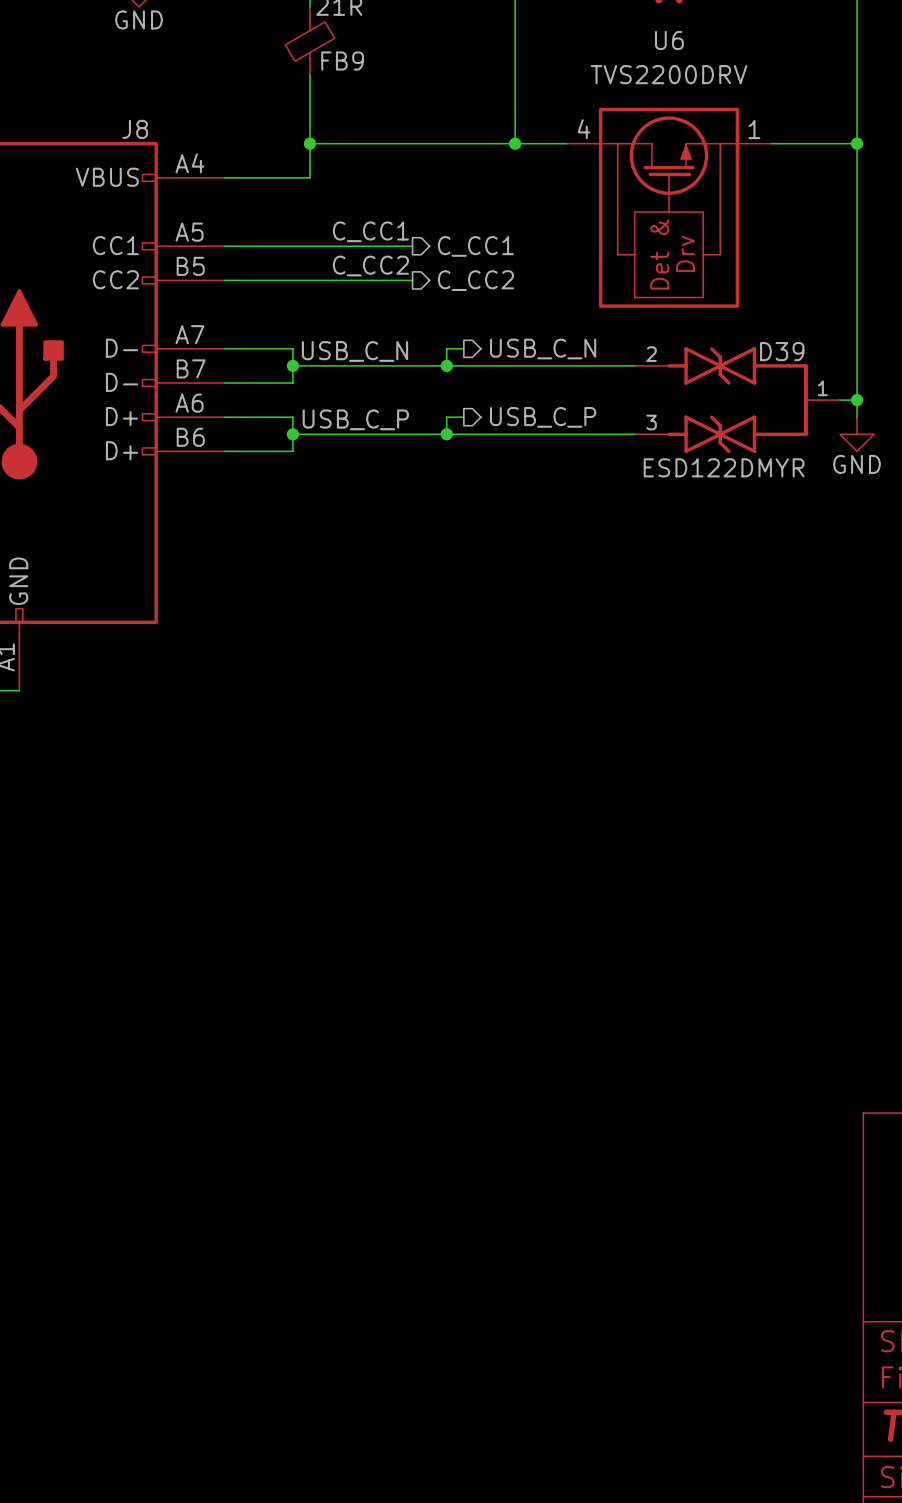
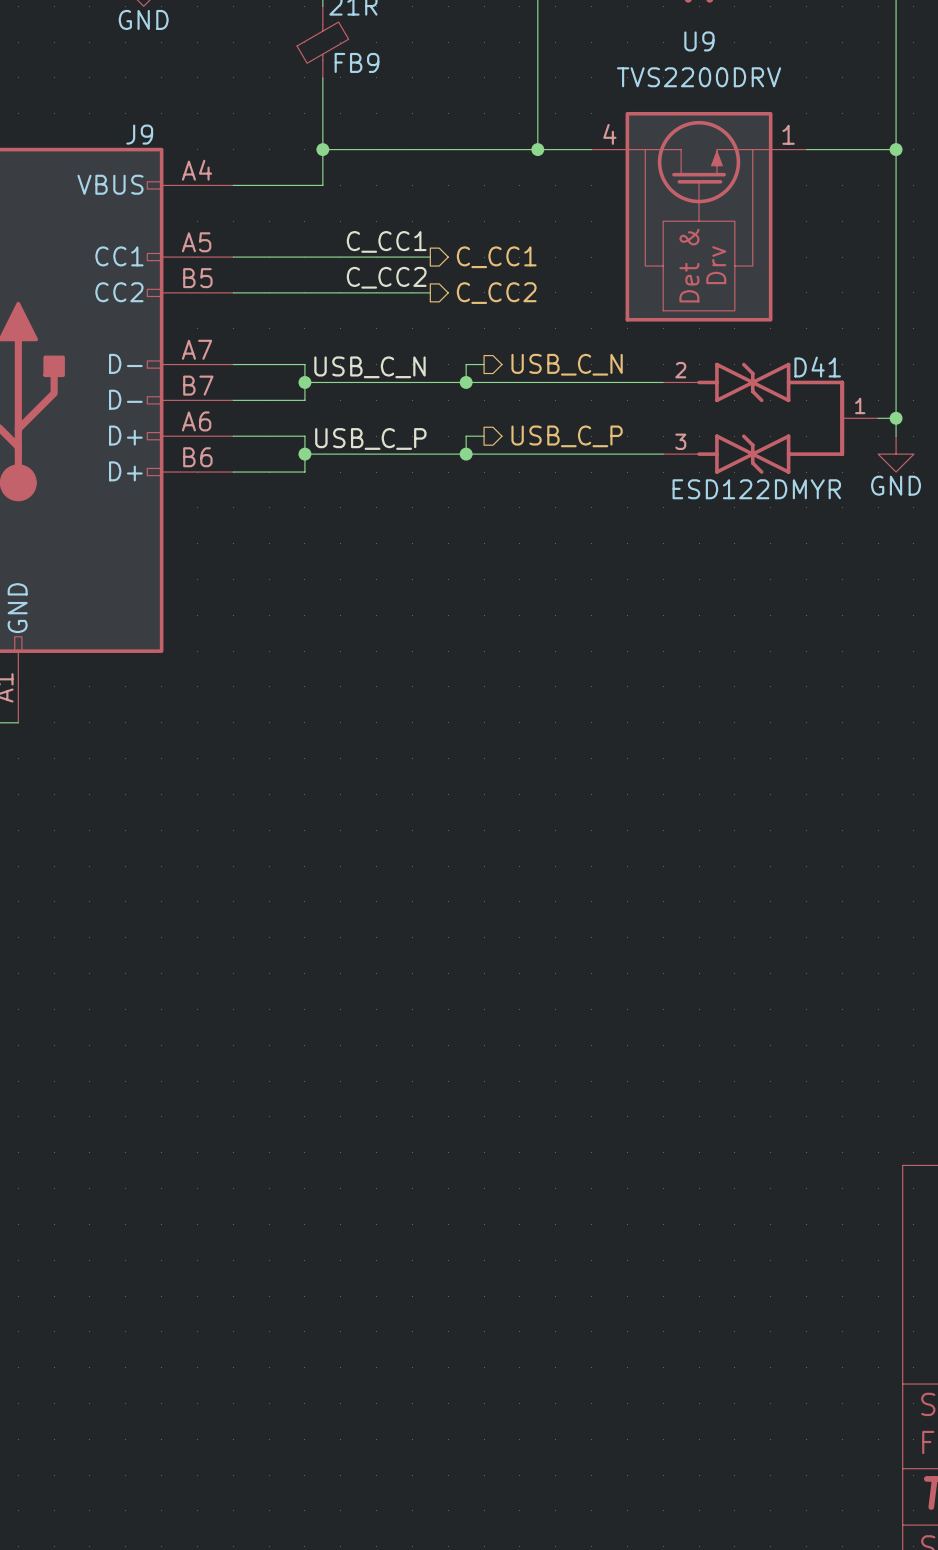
U6 name: U6 (669, 40) -> U9 (699, 41)
J8 name: J8 (135, 129) -> J9 (139, 134)
D39 name: D39 (782, 351) -> D41 (817, 367)

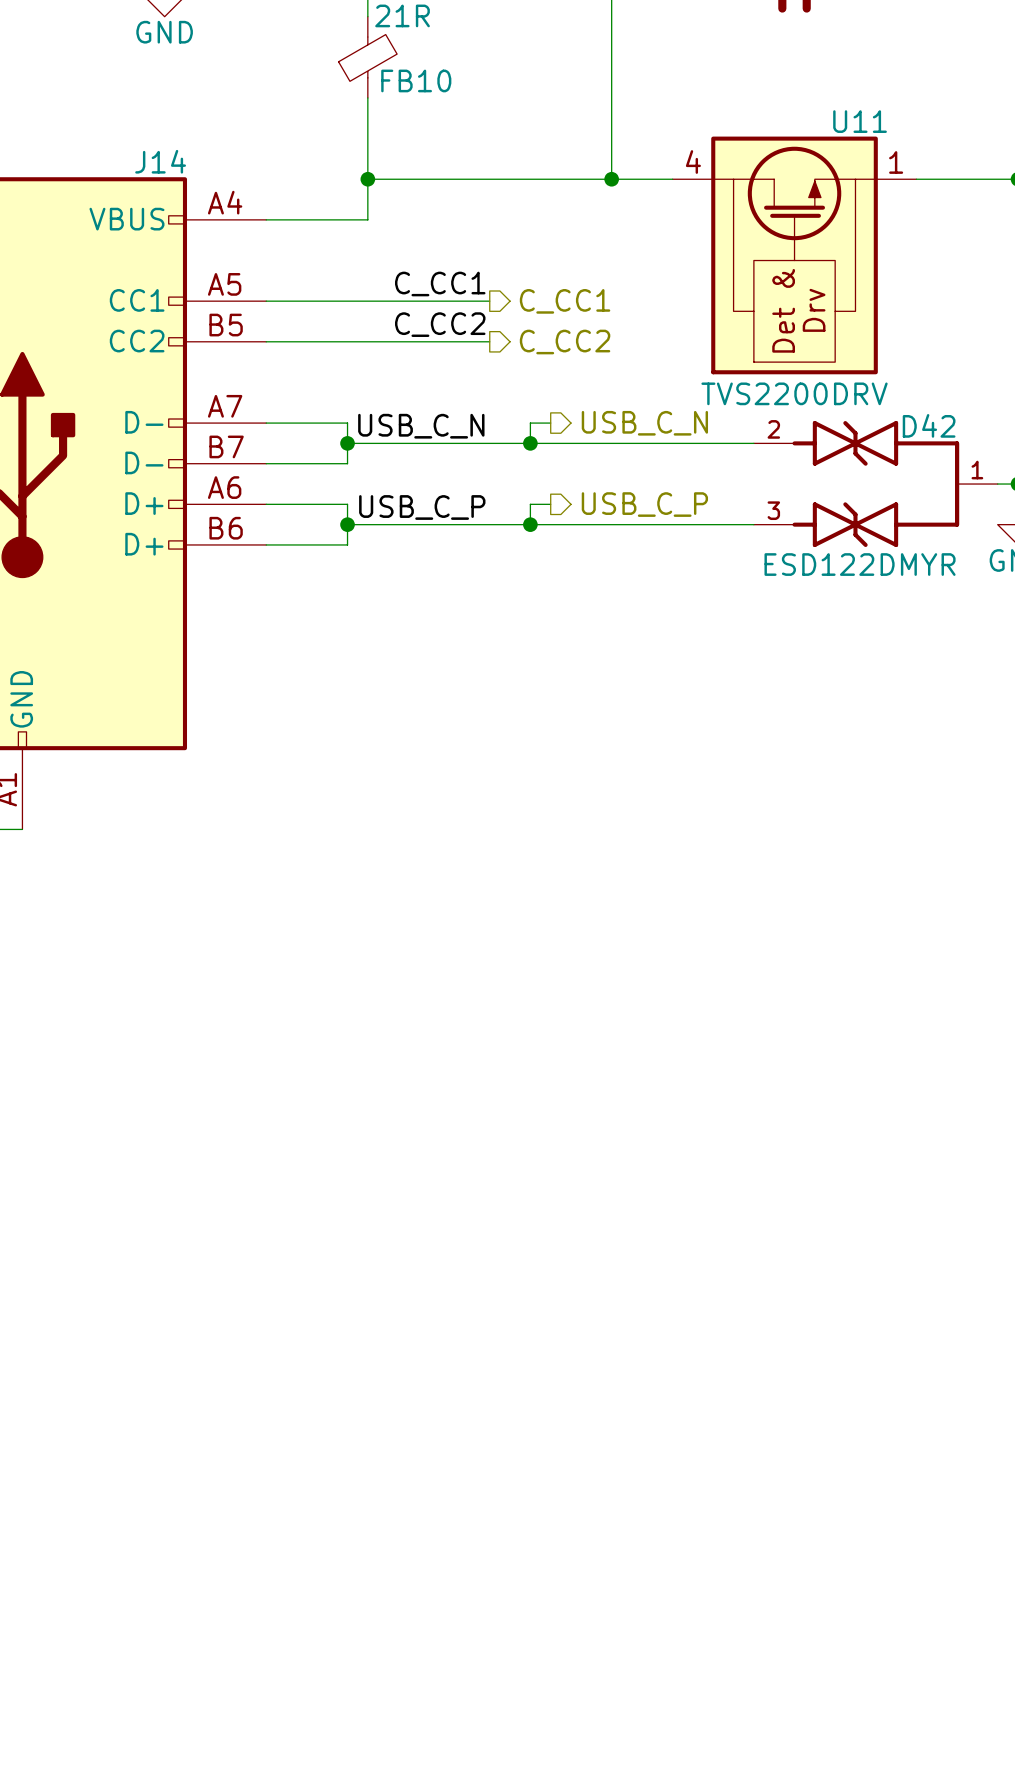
U9 name: U9 (699, 41) -> U11 (860, 121)
FB9 name: FB9 (357, 62) -> FB10 (416, 80)
U9 value position: TVS2200DRV (699, 77) -> TVS2200DRV (794, 393)
J9 name: J9 (139, 134) -> J14 (160, 161)
D41 name: D41 (817, 367) -> D42 (929, 425)

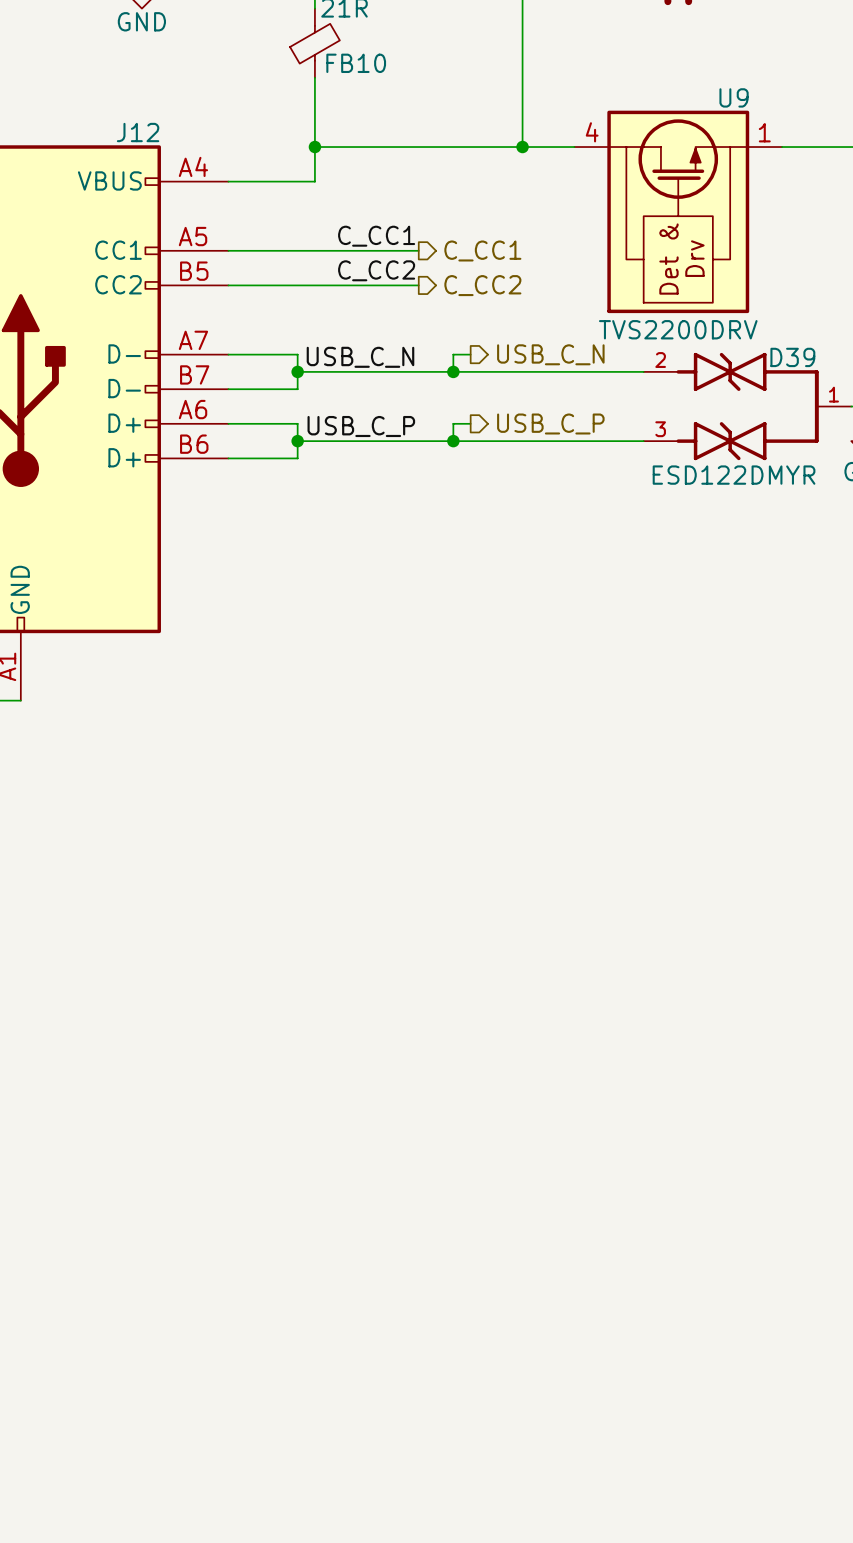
U11 name: U11 (860, 121) -> U9 (734, 97)
J14 name: J14 (160, 161) -> J12 (138, 132)
D42 name: D42 (929, 425) -> D39 (792, 357)

